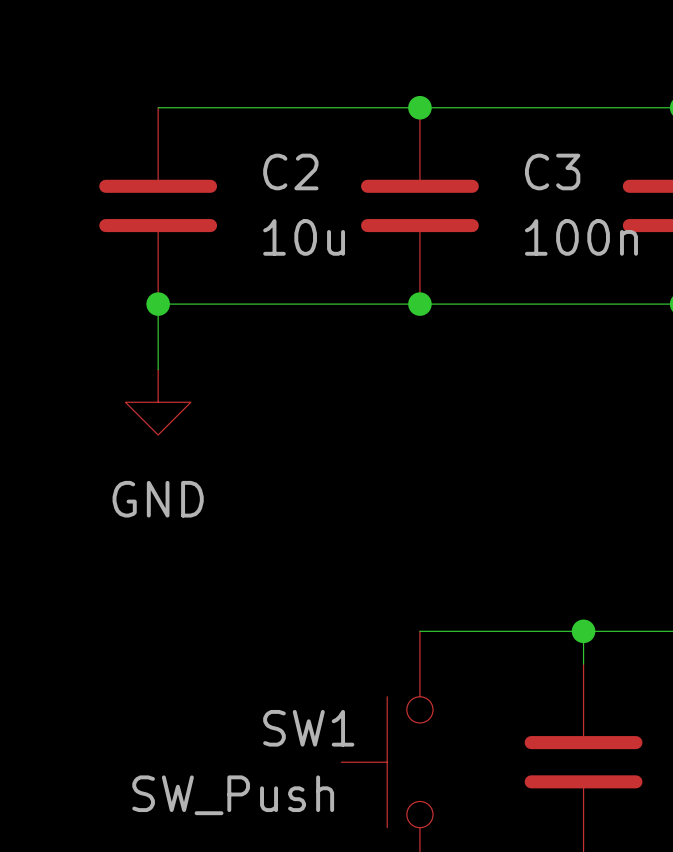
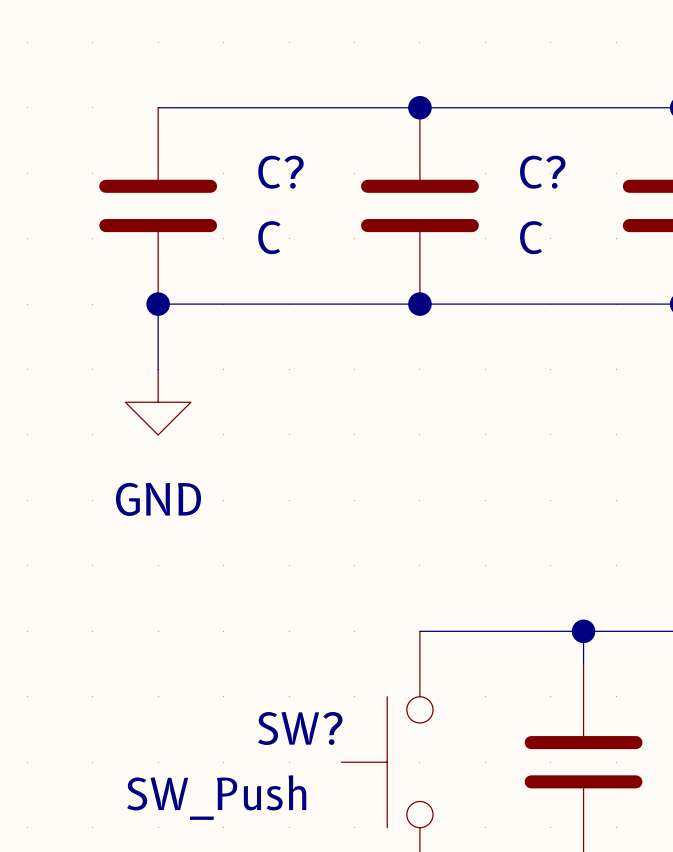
C2 name: C2 (290, 171) -> C? (280, 172)
C3 name: C3 (552, 171) -> C? (542, 172)
C2 value: 10u (304, 237) -> C (269, 237)
C3 value: 100n (581, 237) -> C (531, 237)
SW1 name: SW1 (308, 728) -> SW? (300, 728)

